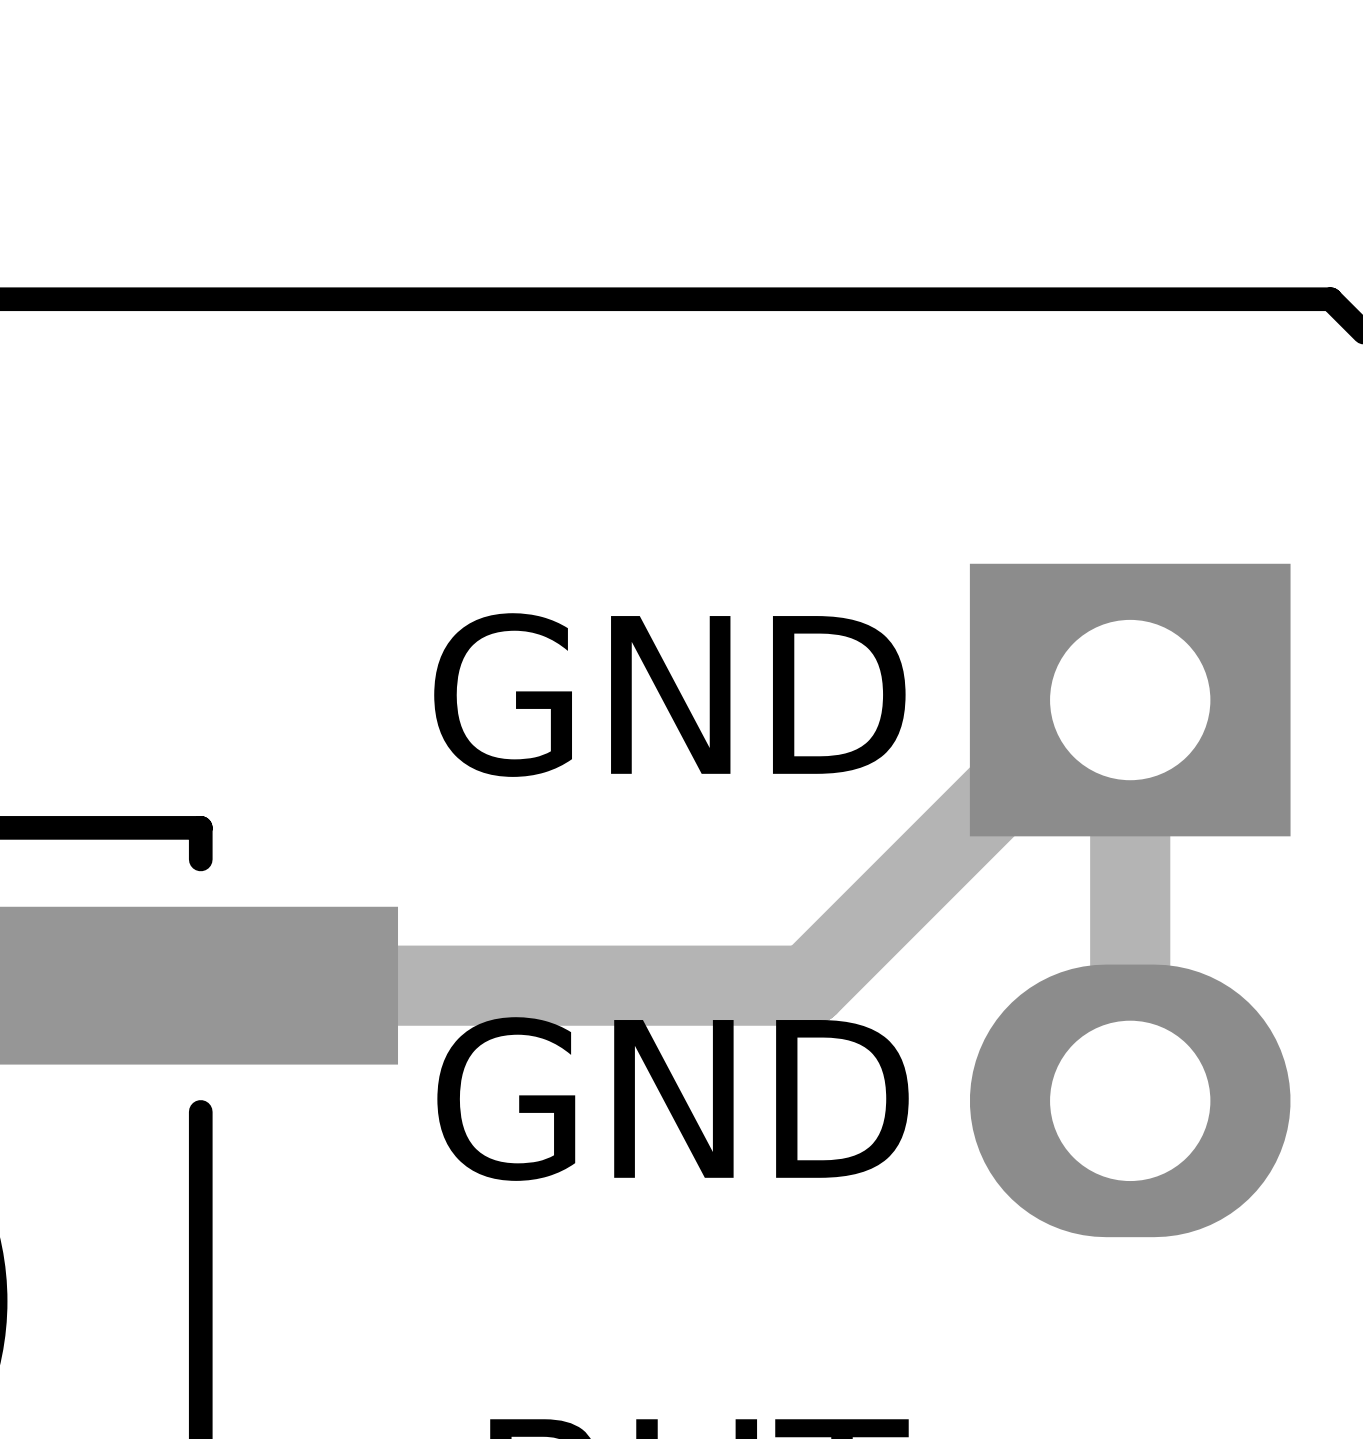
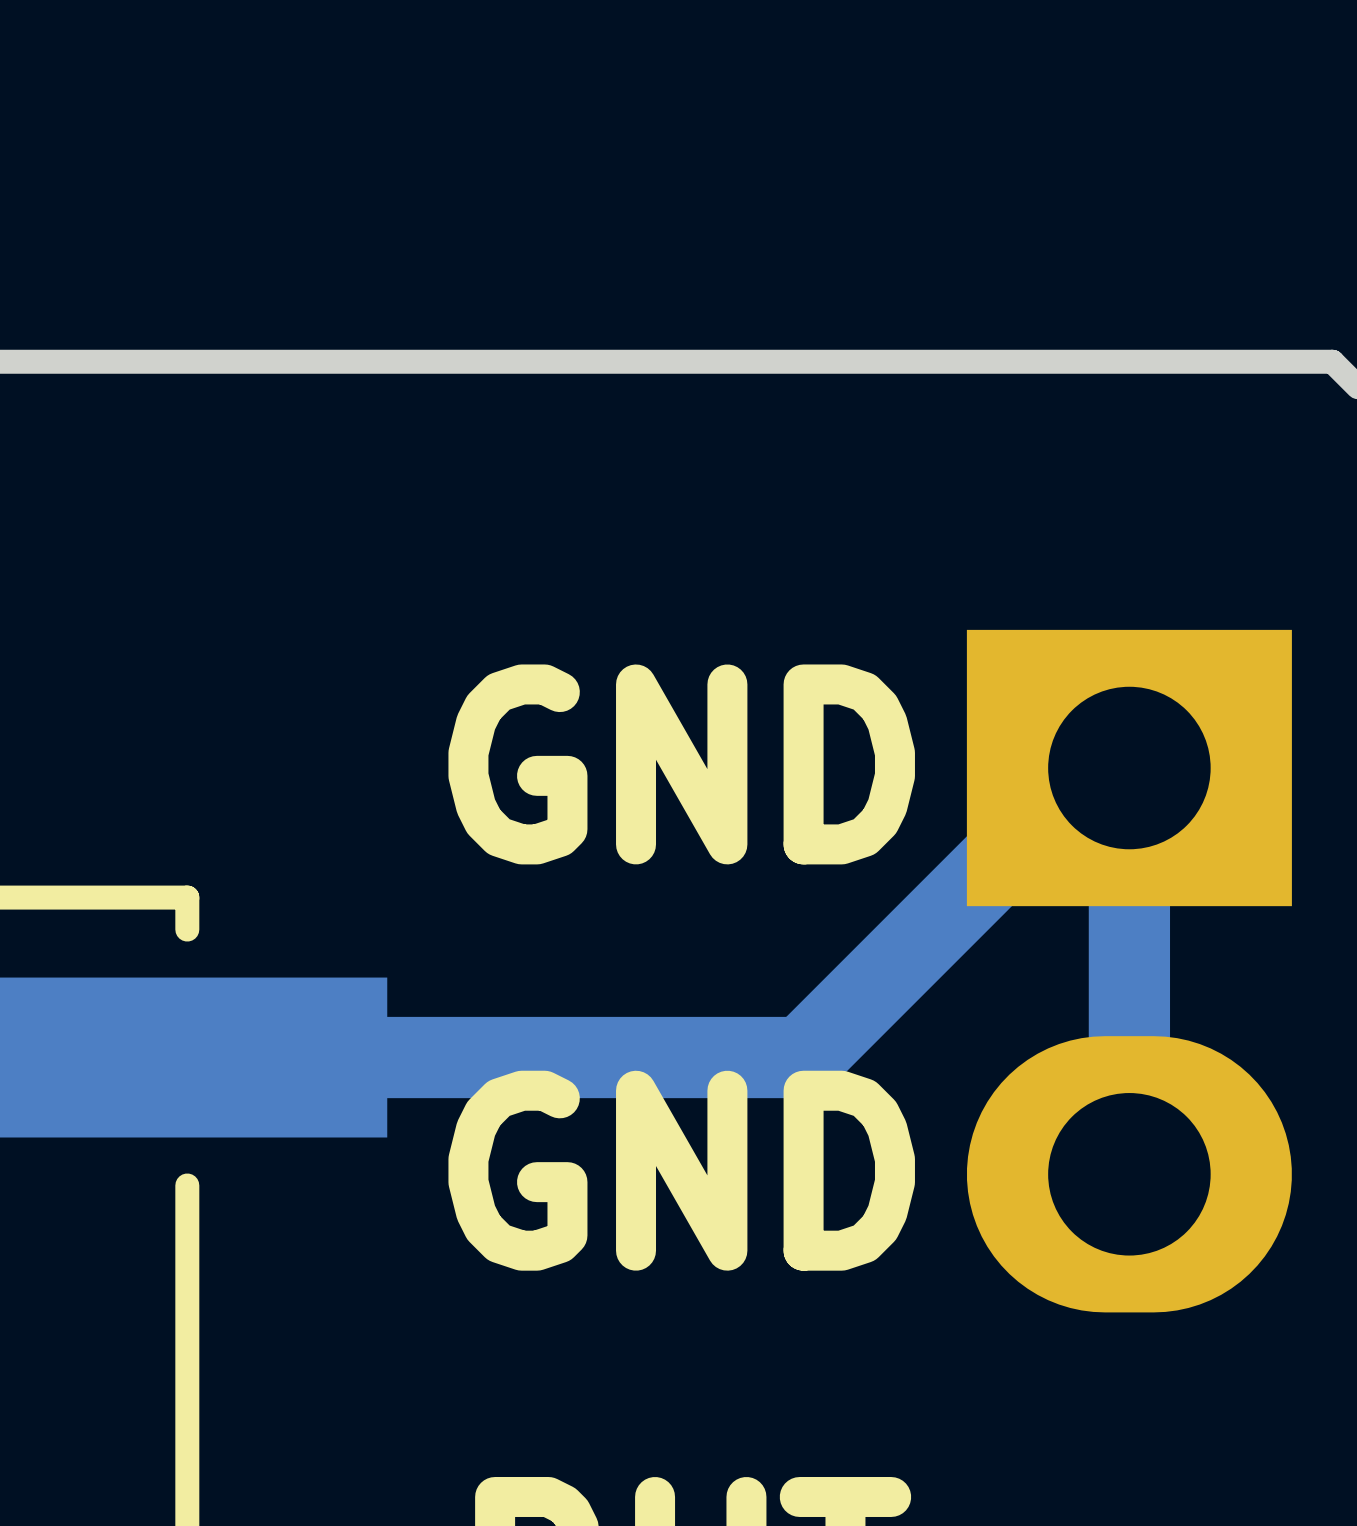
text position: GND (669, 695) -> GND (681, 764)
text position: GND (673, 1099) -> GND (681, 1170)

